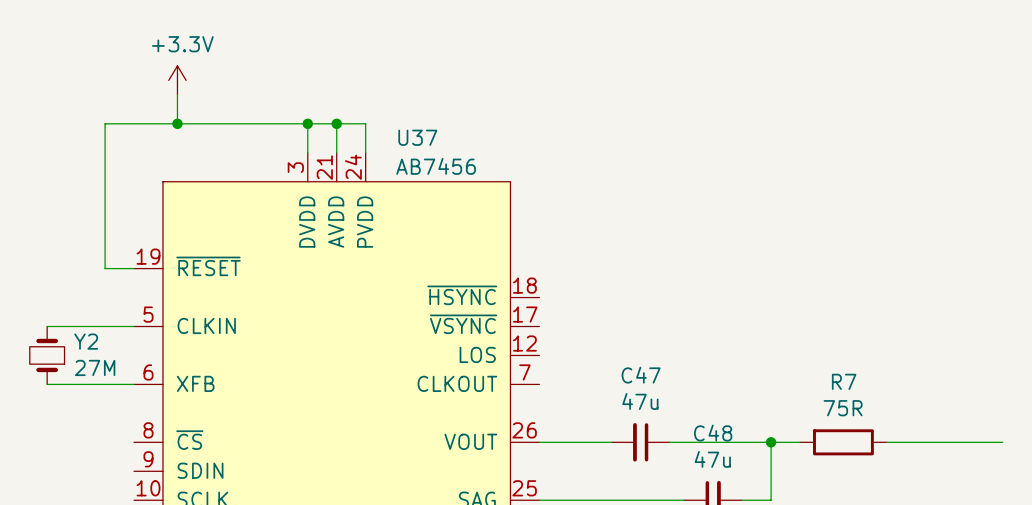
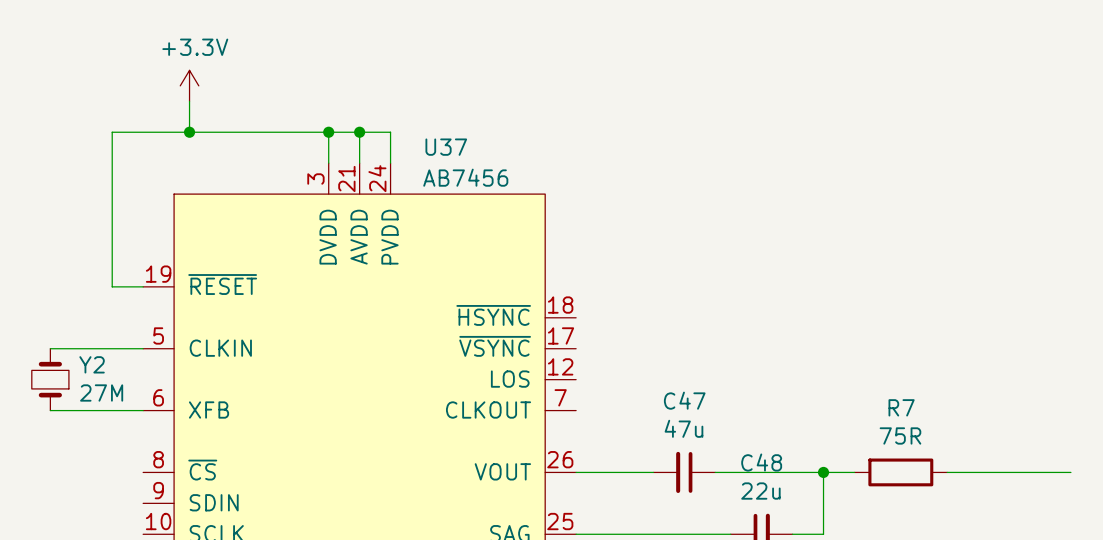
C48 value: 47u (712, 459) -> 22u (760, 491)

